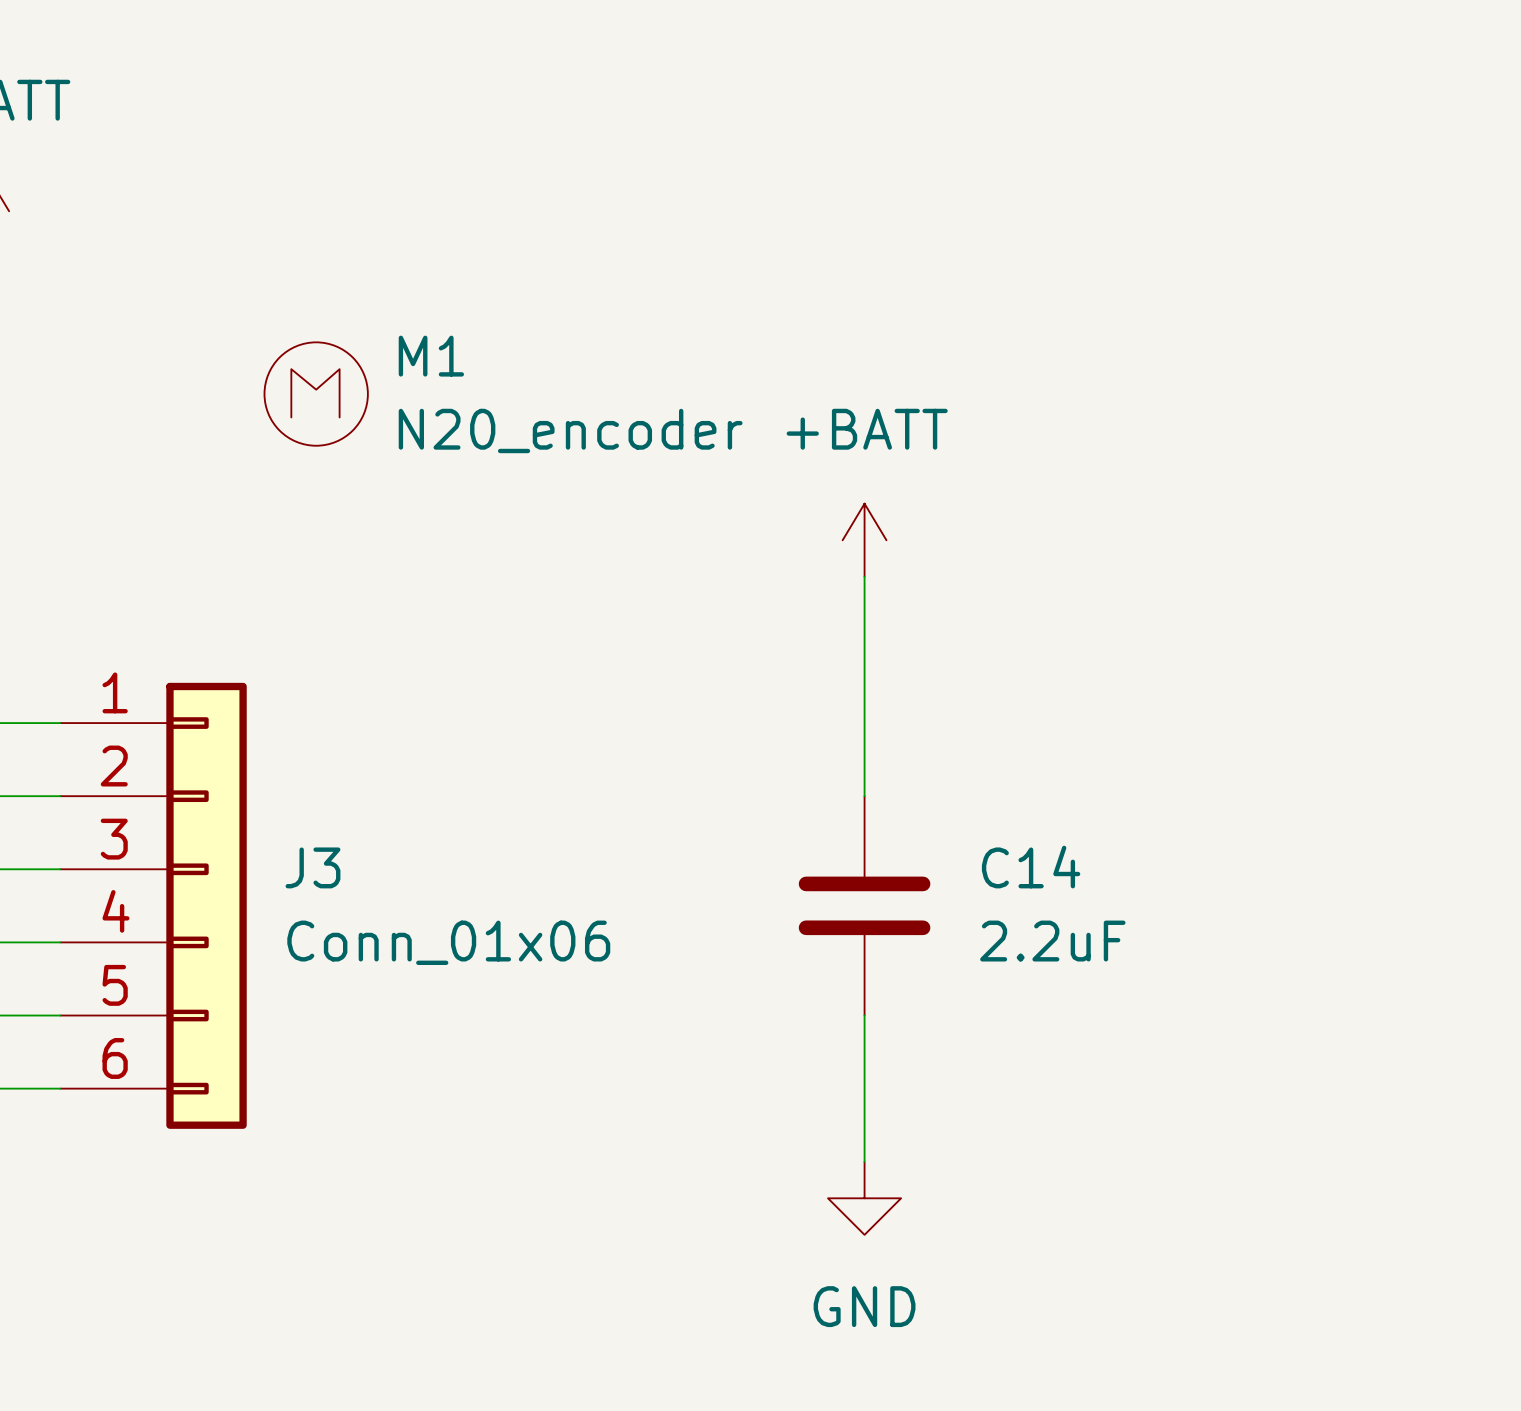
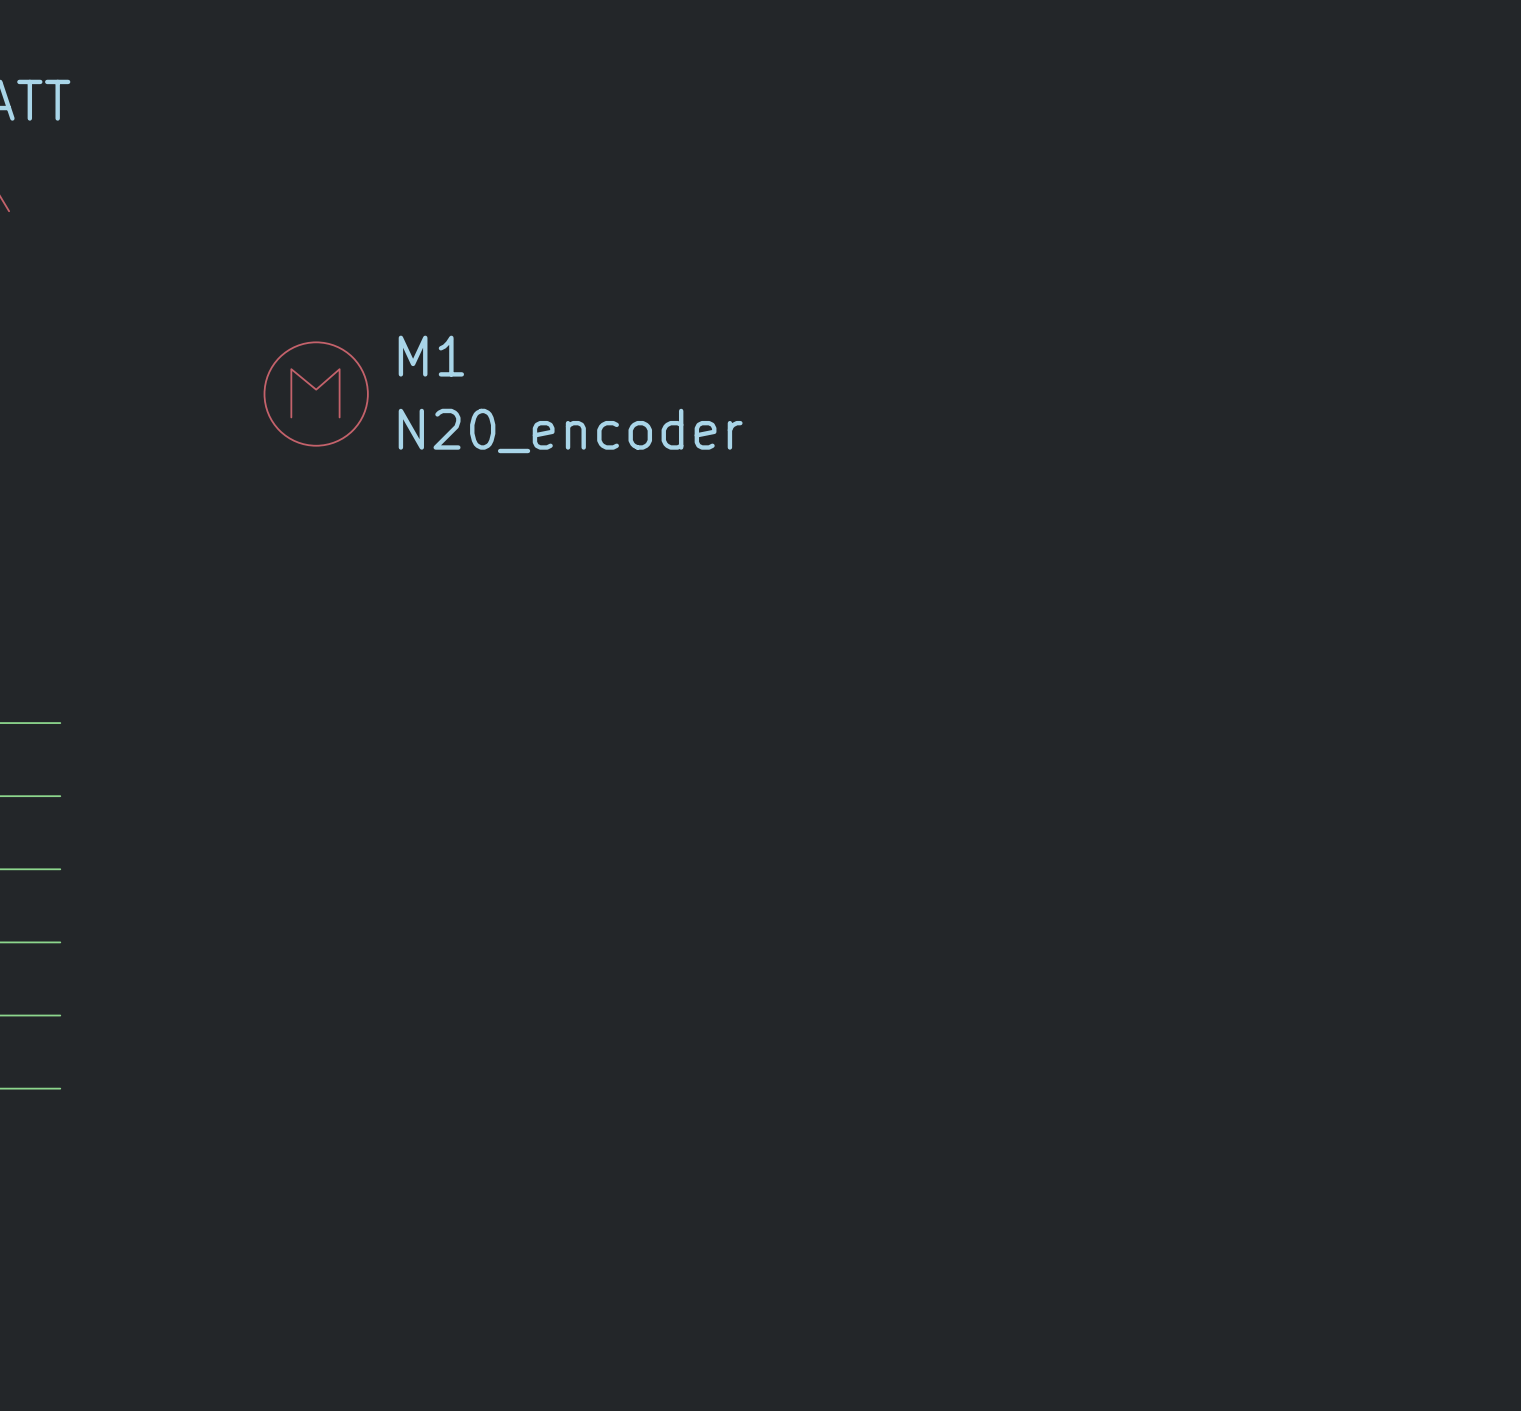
power symbol: +BATT (864, 540) -> none
wire: (864, 576) (864, 796) -> none
J3: Conn_01x06 (153, 905) -> none
C14: 2.2uF (864, 905) -> none
wire: (864, 1015) (864, 1161) -> none
power symbol: GND (864, 1198) -> none

